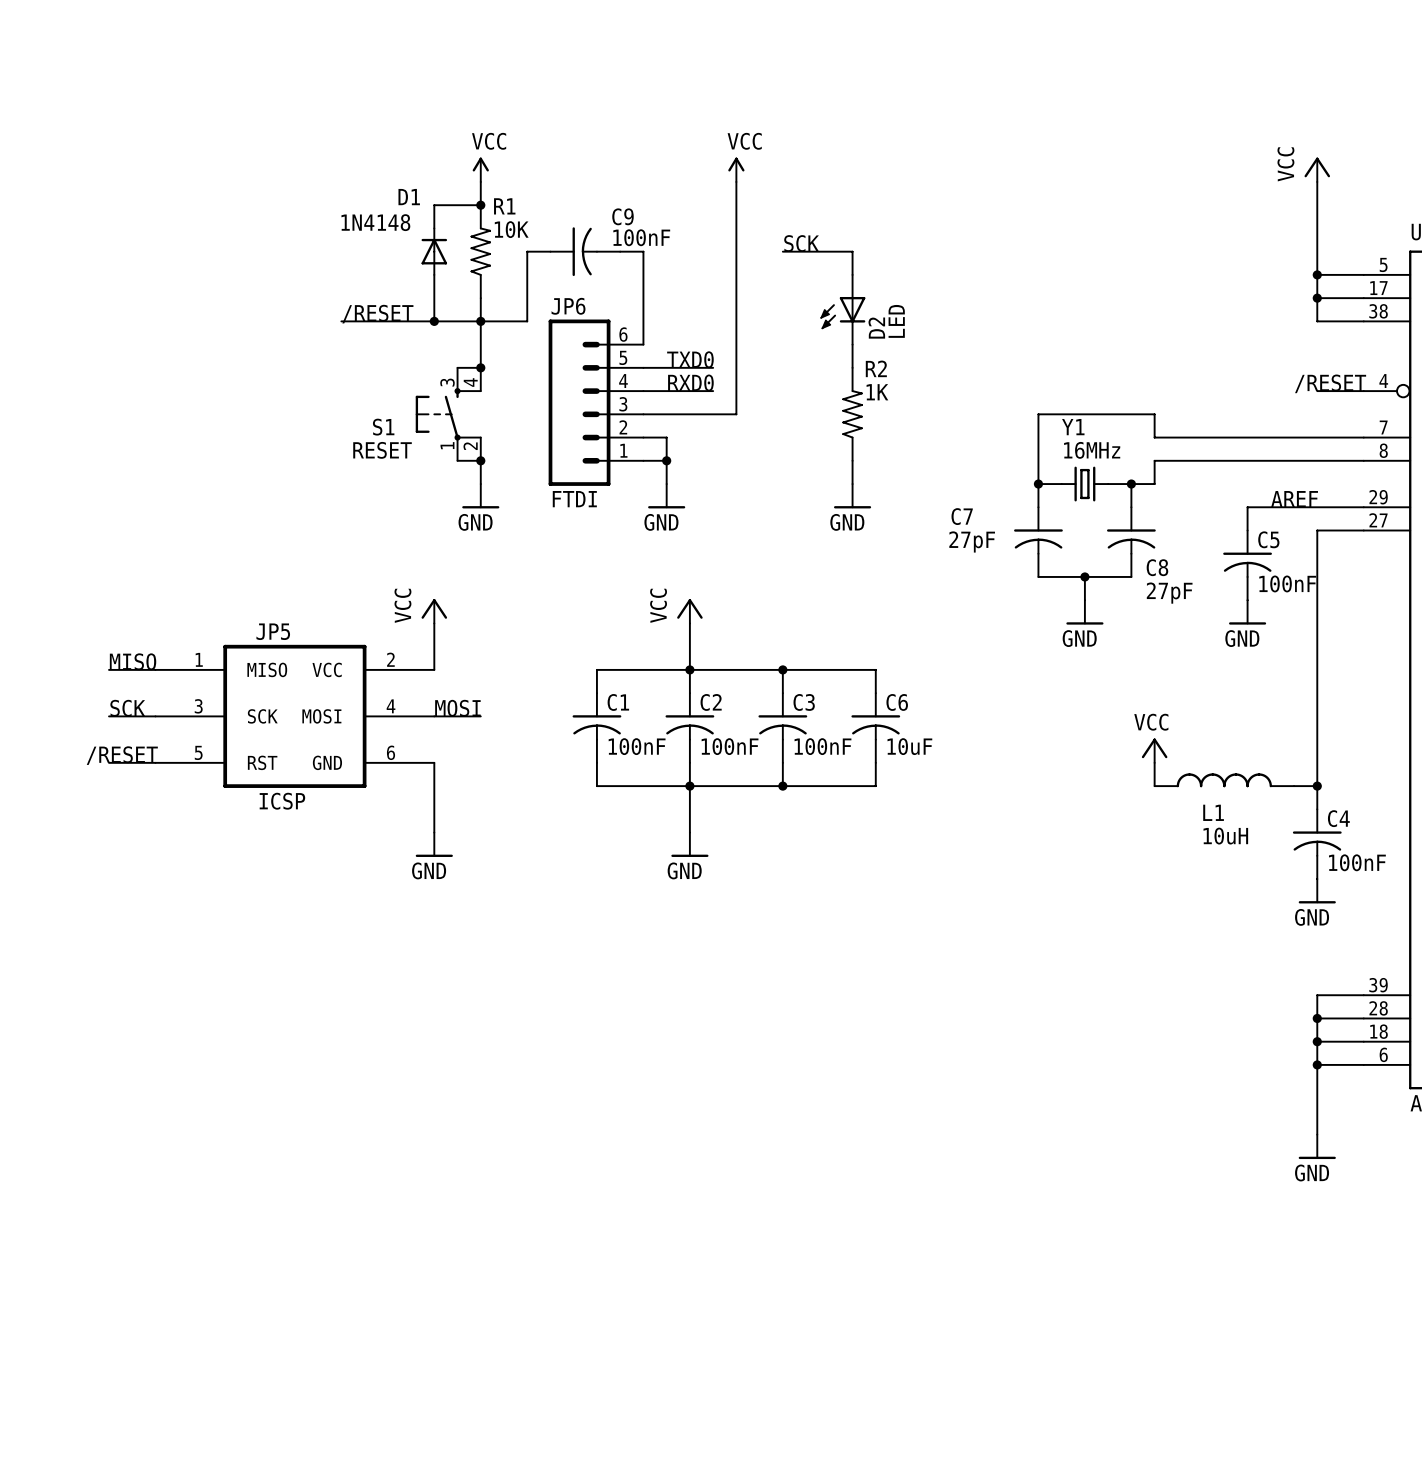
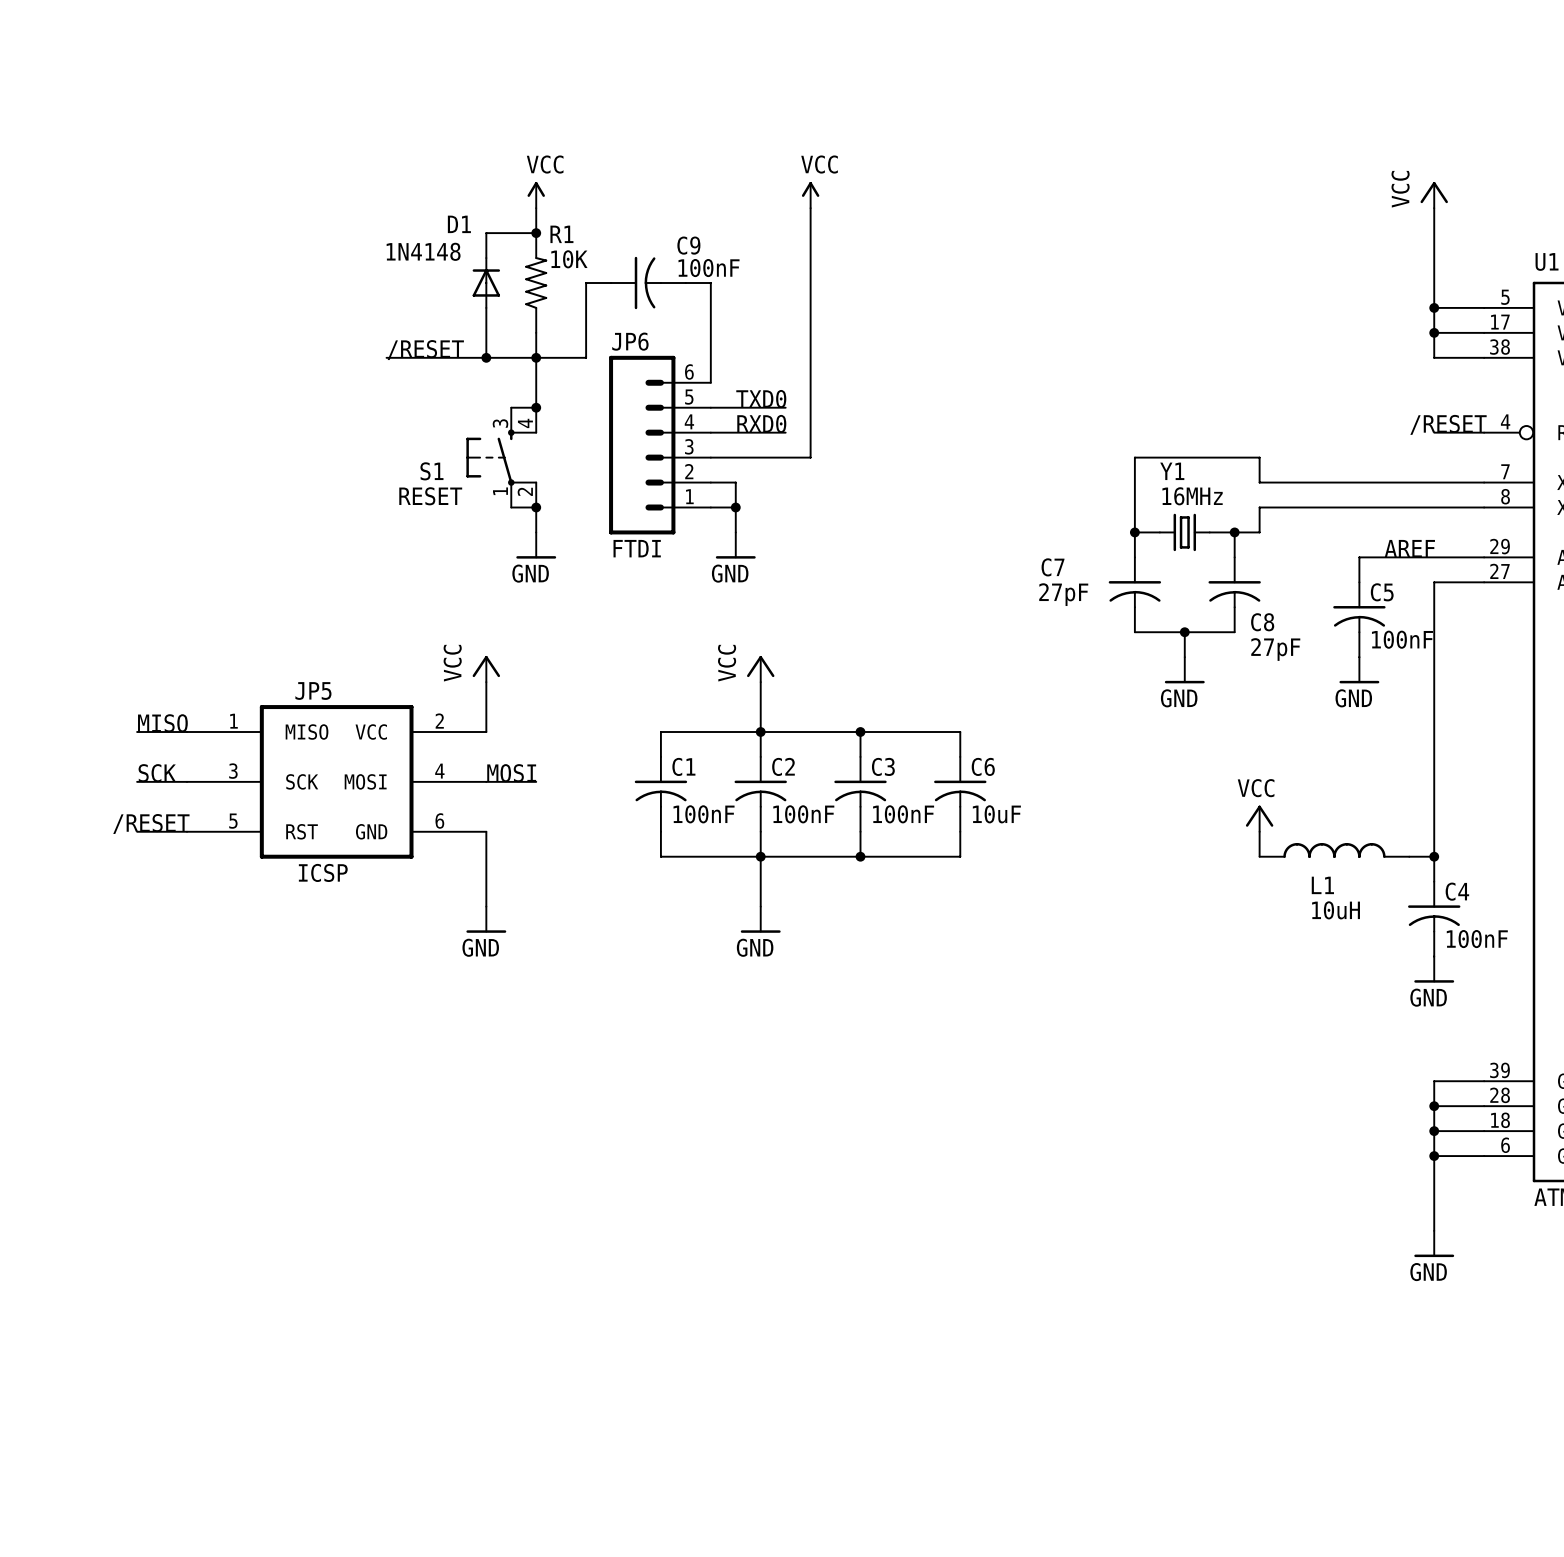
label: SCK (801, 243) -> none
wire: (782, 251) (852, 251) (852, 274) -> none
D2: LED (842, 309) -> none
wire: (852, 344) (852, 367) -> none
R2: 1K (852, 414) -> none
wire: (852, 460) (852, 484) -> none
power symbol: GND (852, 496) -> none

